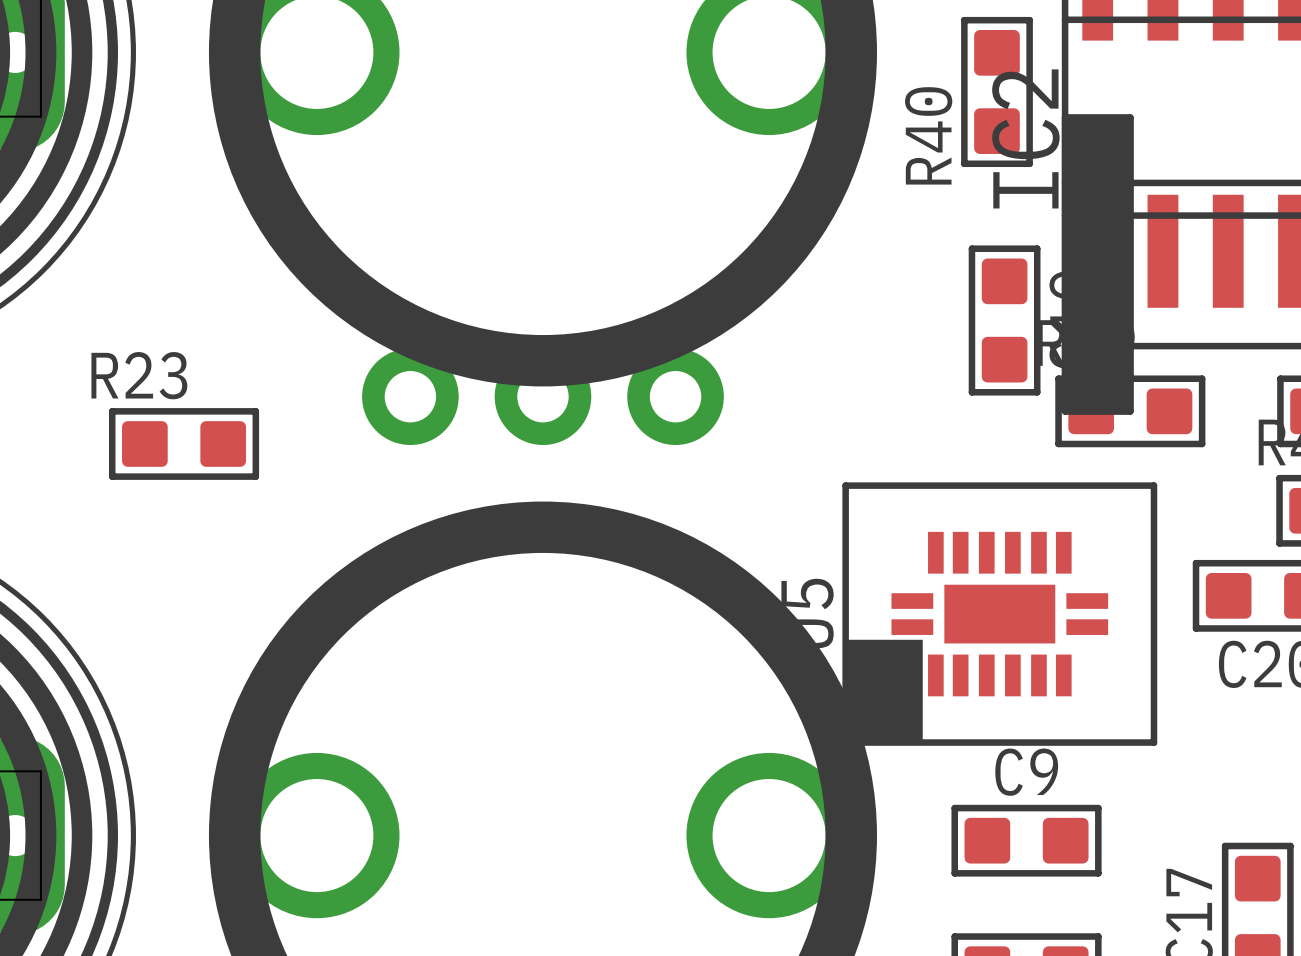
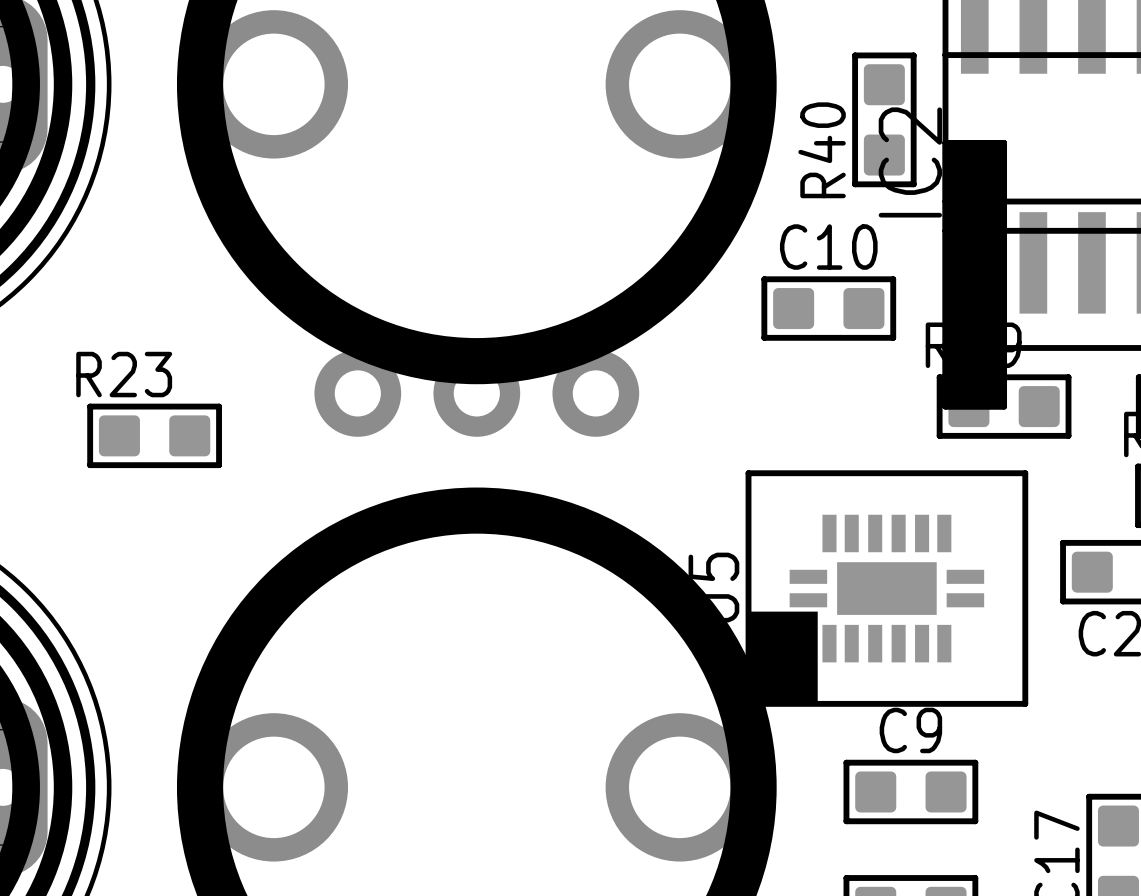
C10 rotation: 0° (1004, 320) -> 90° clockwise (828, 308)

